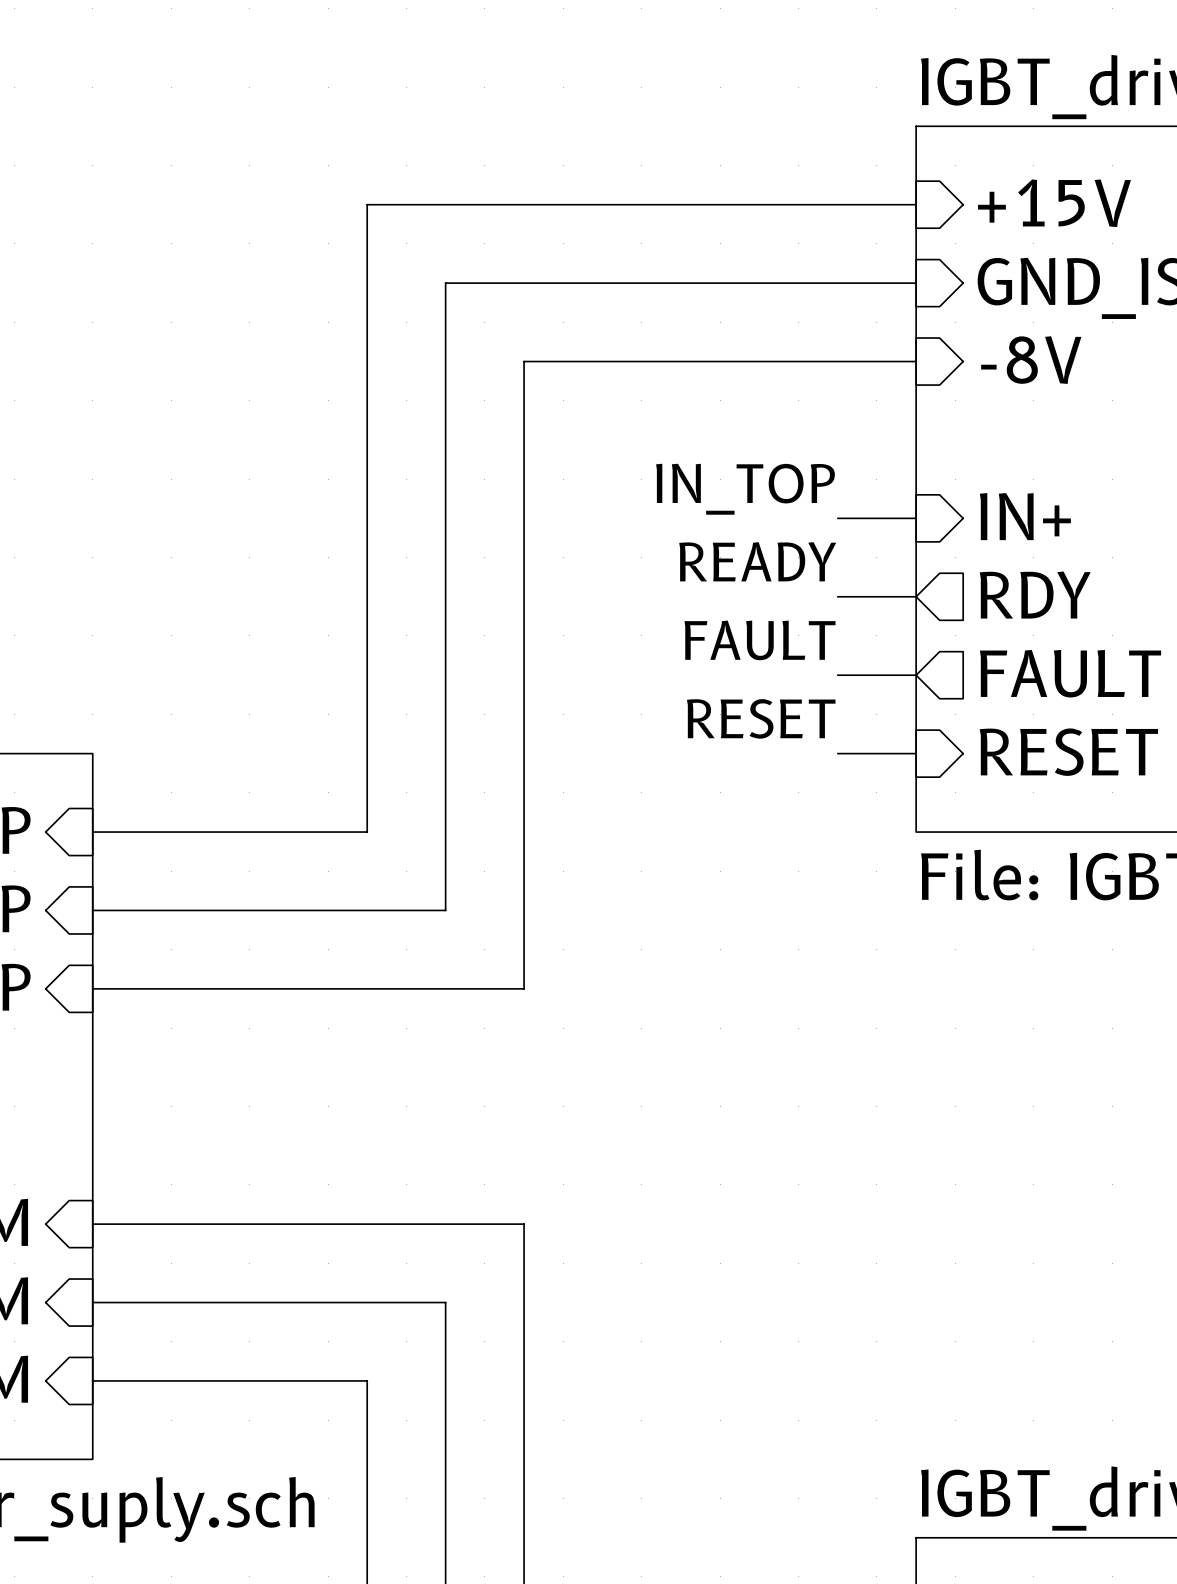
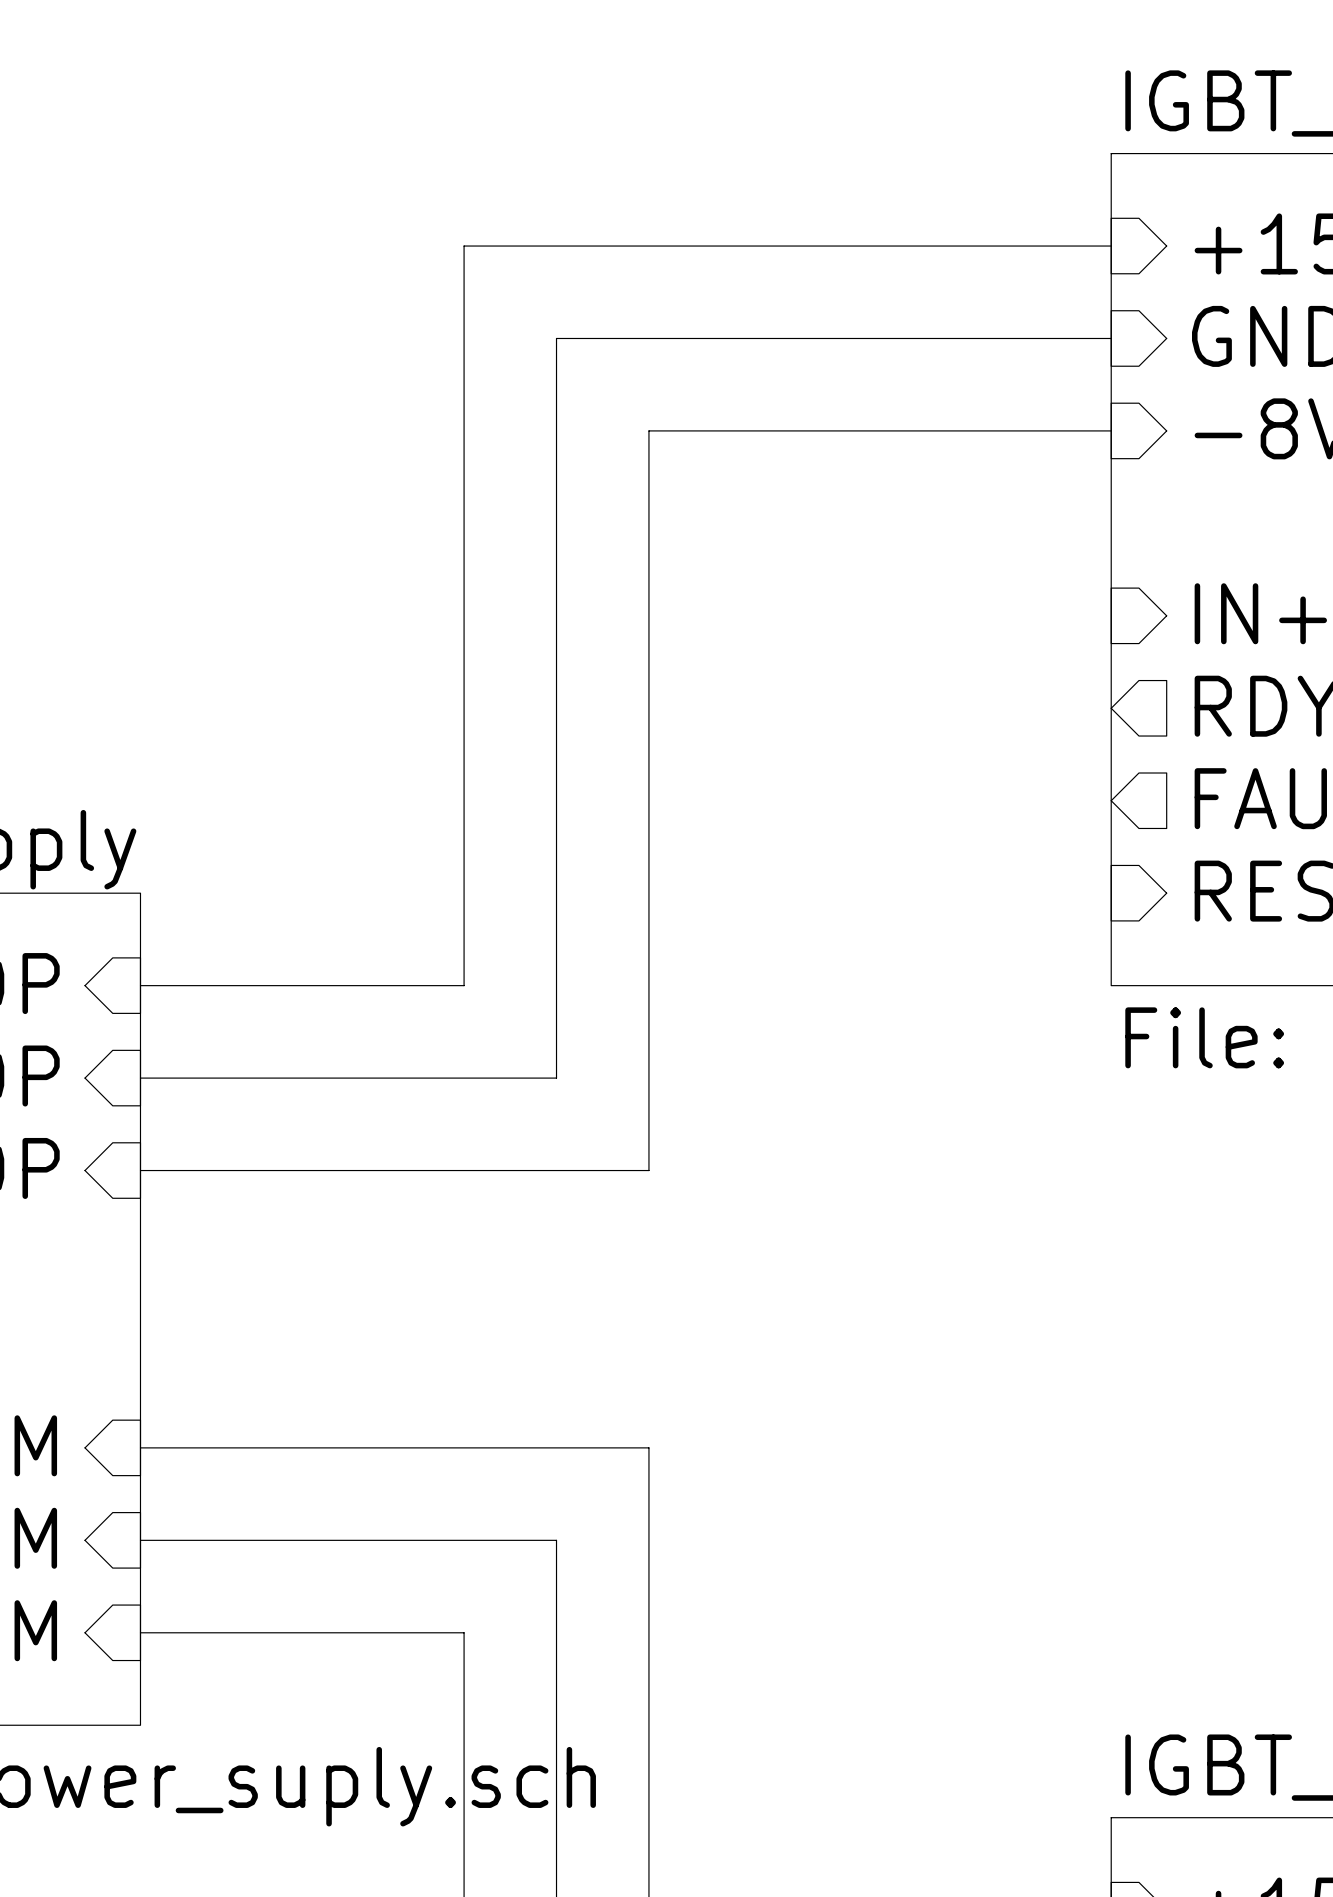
label: IN_TOP (745, 489) -> none
wire: (837, 518) (916, 518) -> none
label: READY (757, 561) -> none
wire: (837, 596) (916, 596) -> none
label: FAULT (760, 640) -> none
wire: (837, 675) (916, 675) -> none
label: RESET (761, 718) -> none
wire: (837, 753) (916, 753) -> none

